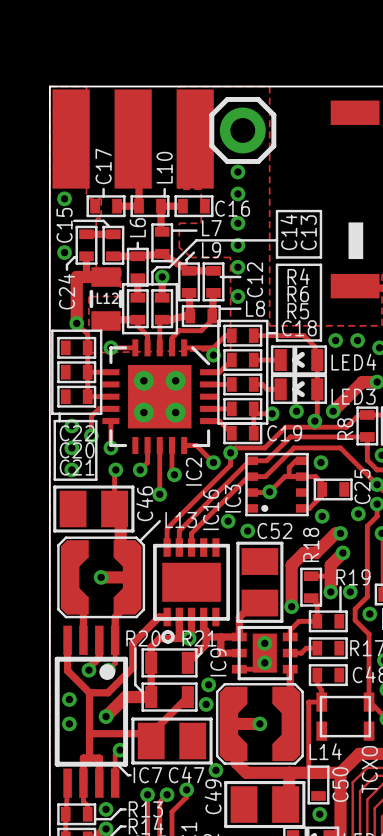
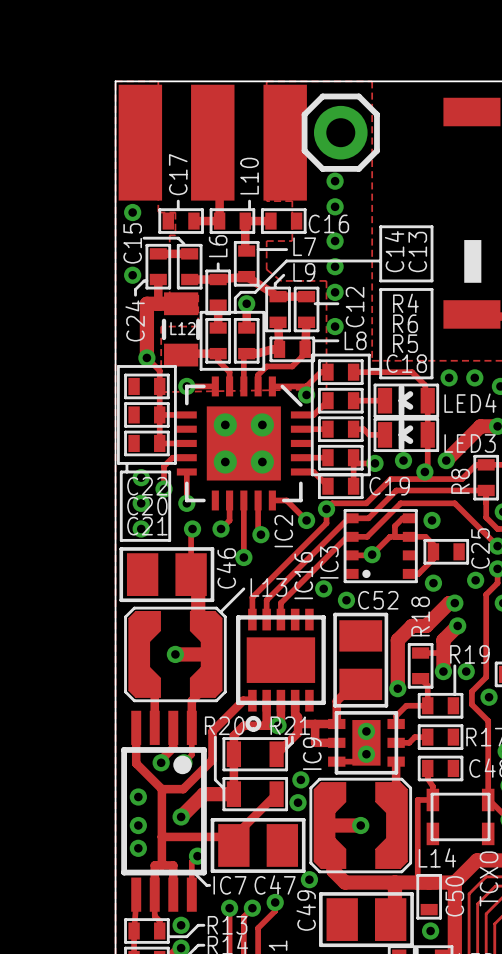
via: none -> (138, 848)

